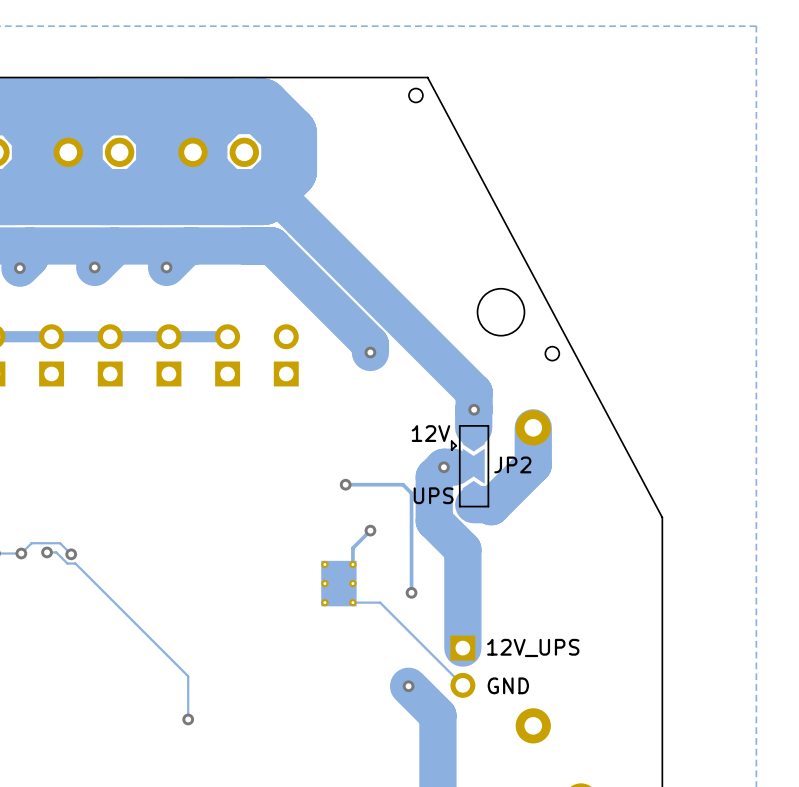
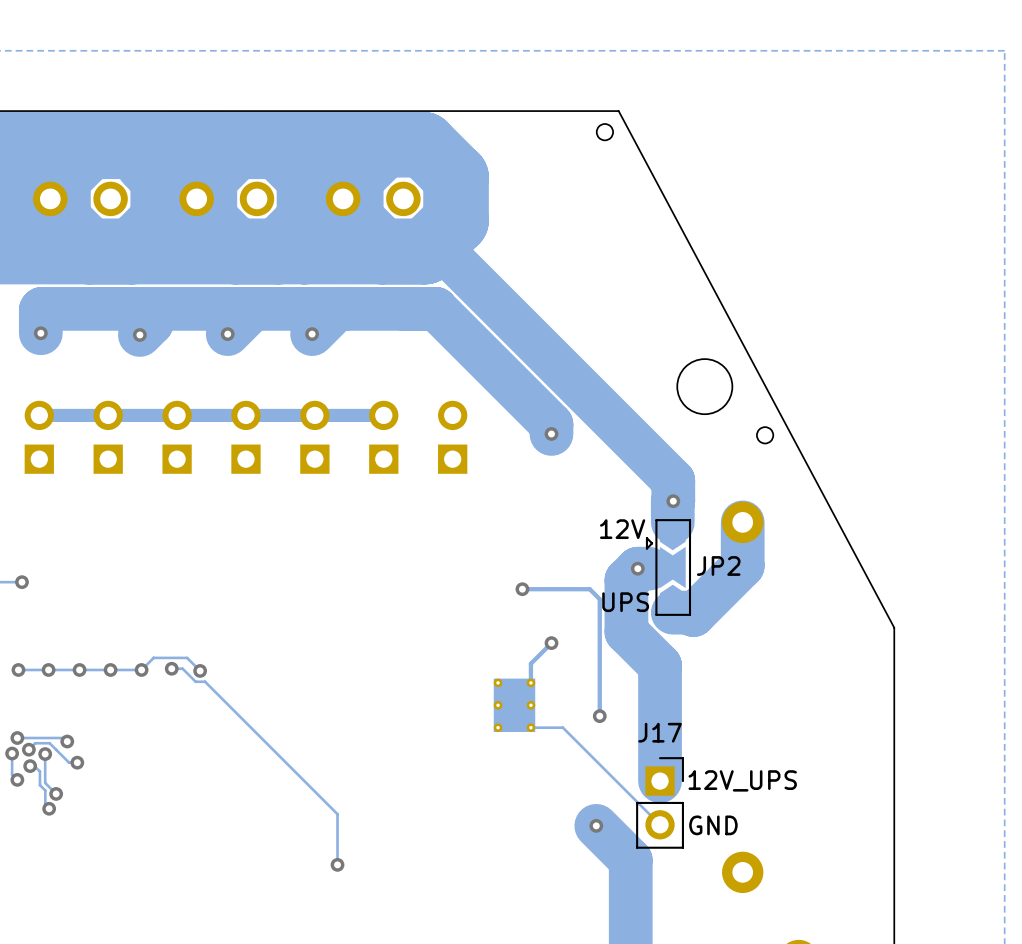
J17 side: top (462, 666) -> bottom (660, 802)

